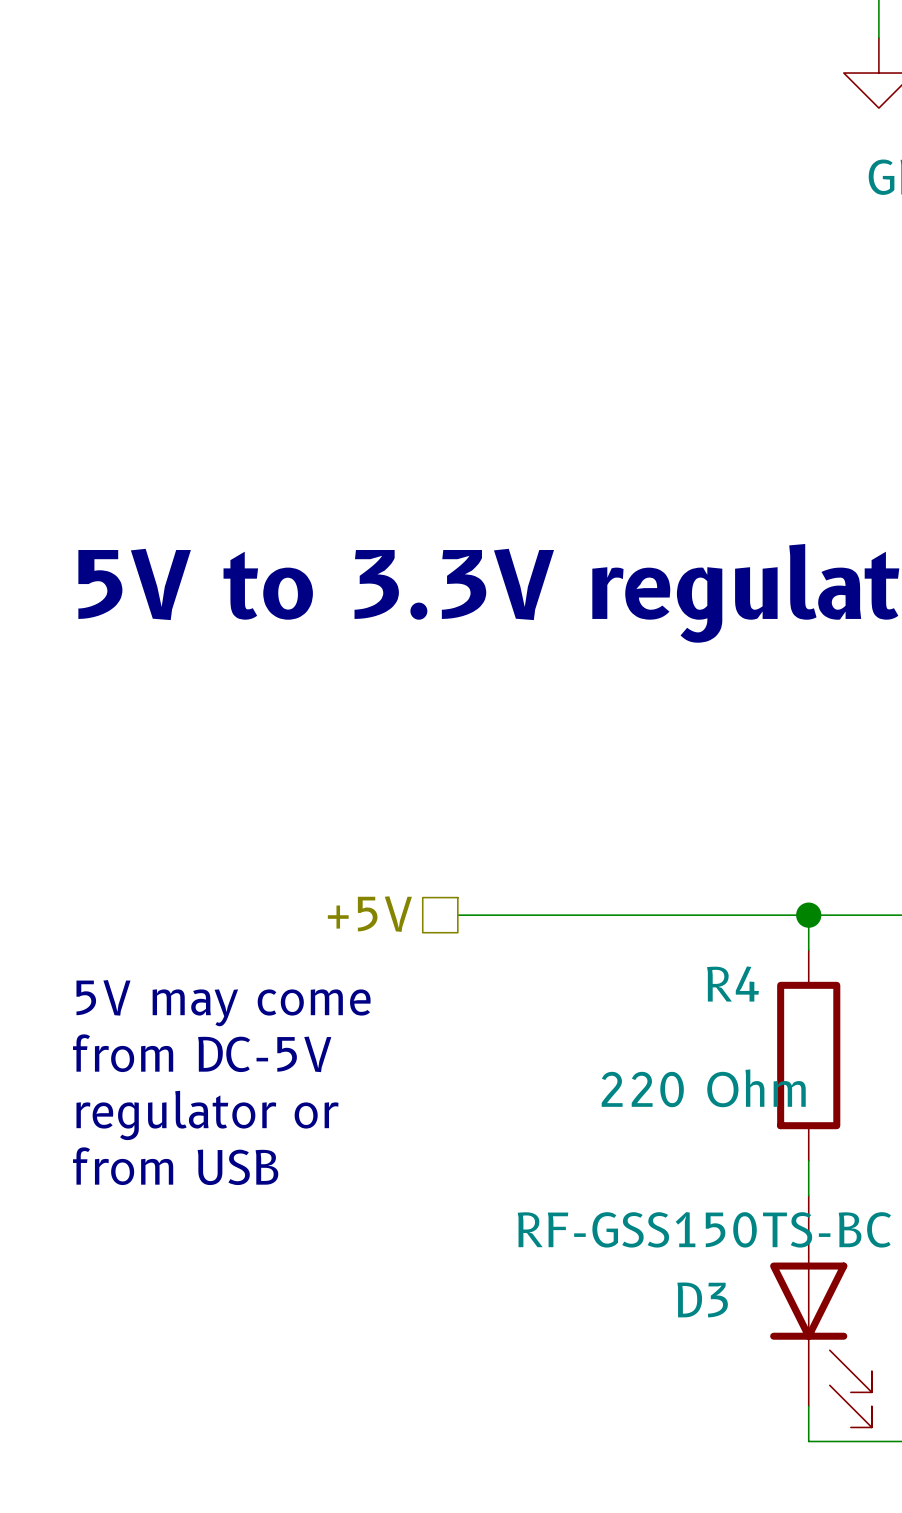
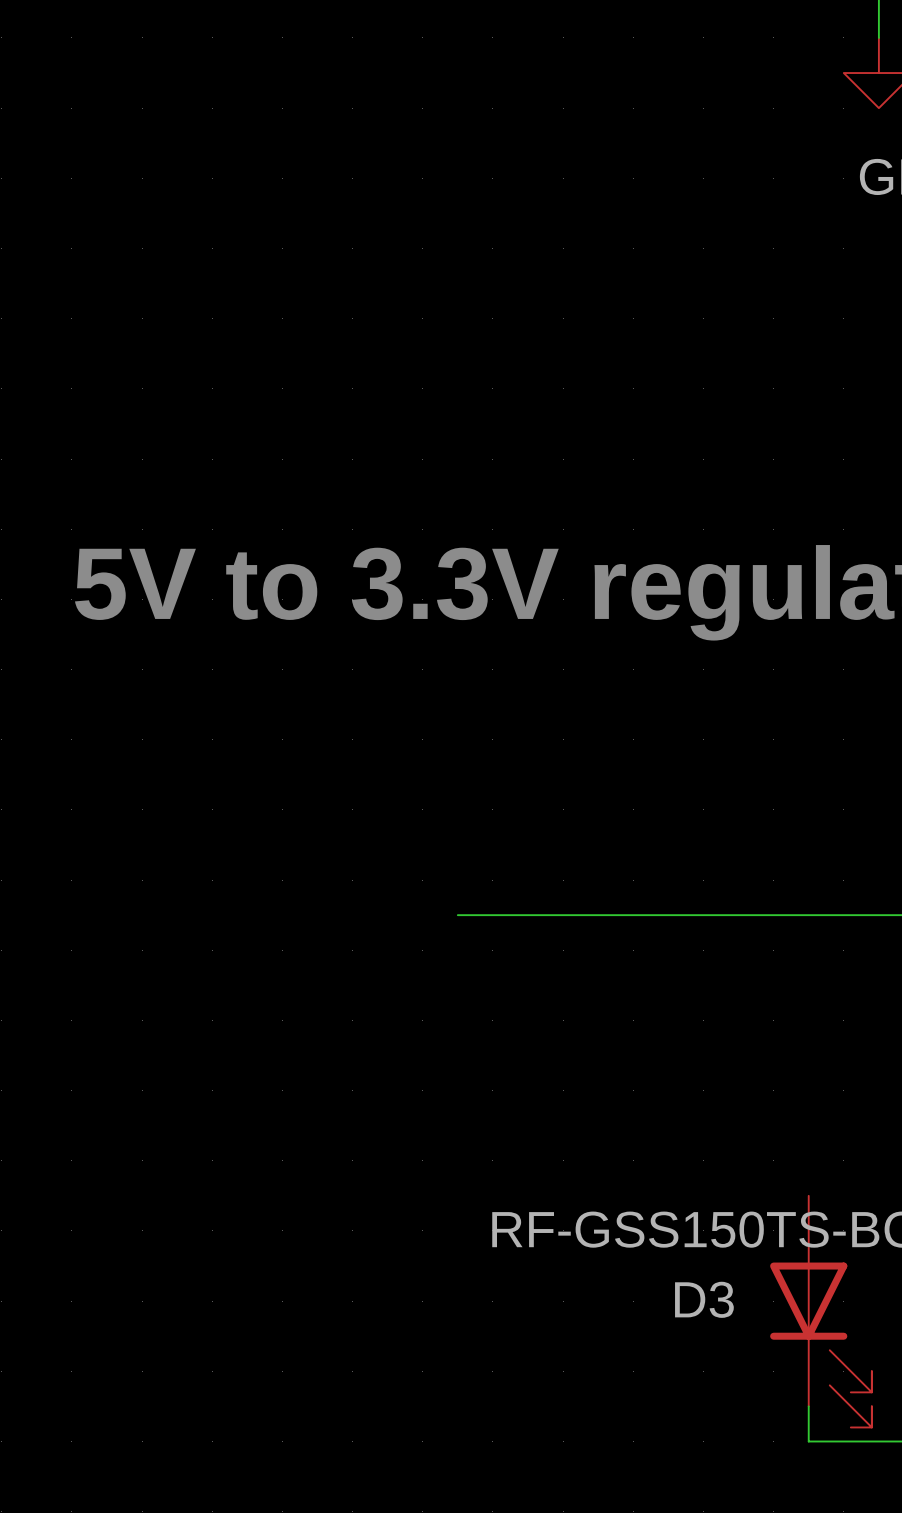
hierarchical label: +5V (369, 914) -> none
wire: (808, 915) (808, 950) -> none
junction: (808, 915) -> none
text: 5V may come (223, 1003) -> none
text: from DC-5V (202, 1053) -> none
R4: 220 Ohm (808, 1055) -> none
text: regulator or (207, 1115) -> none
wire: (808, 1160) (808, 1195) -> none
text: from USB (175, 1166) -> none

